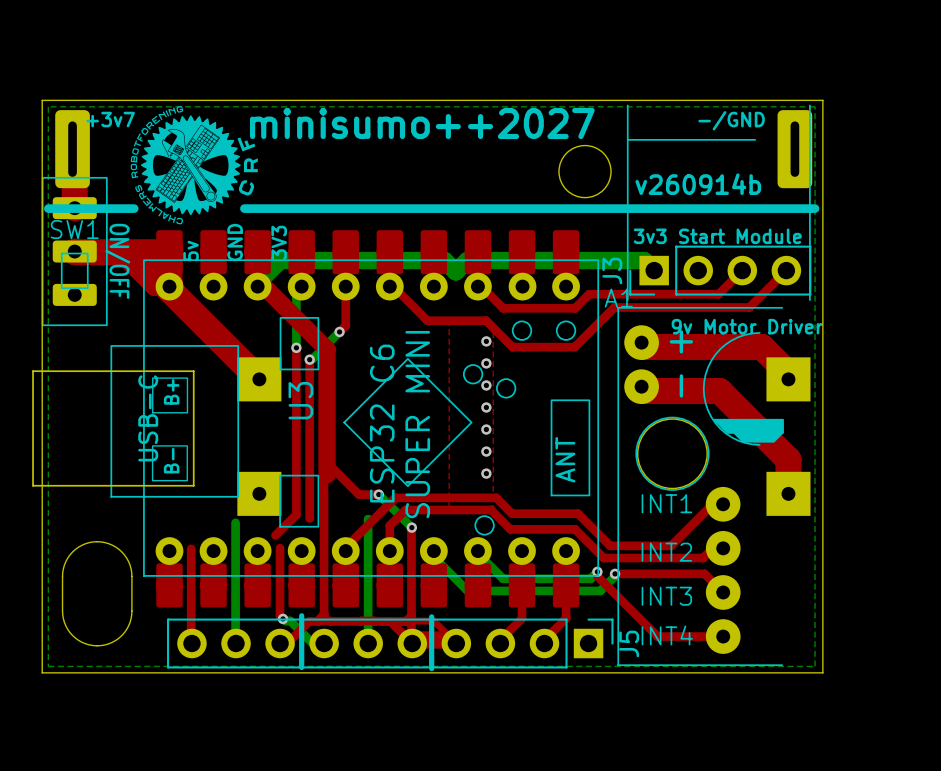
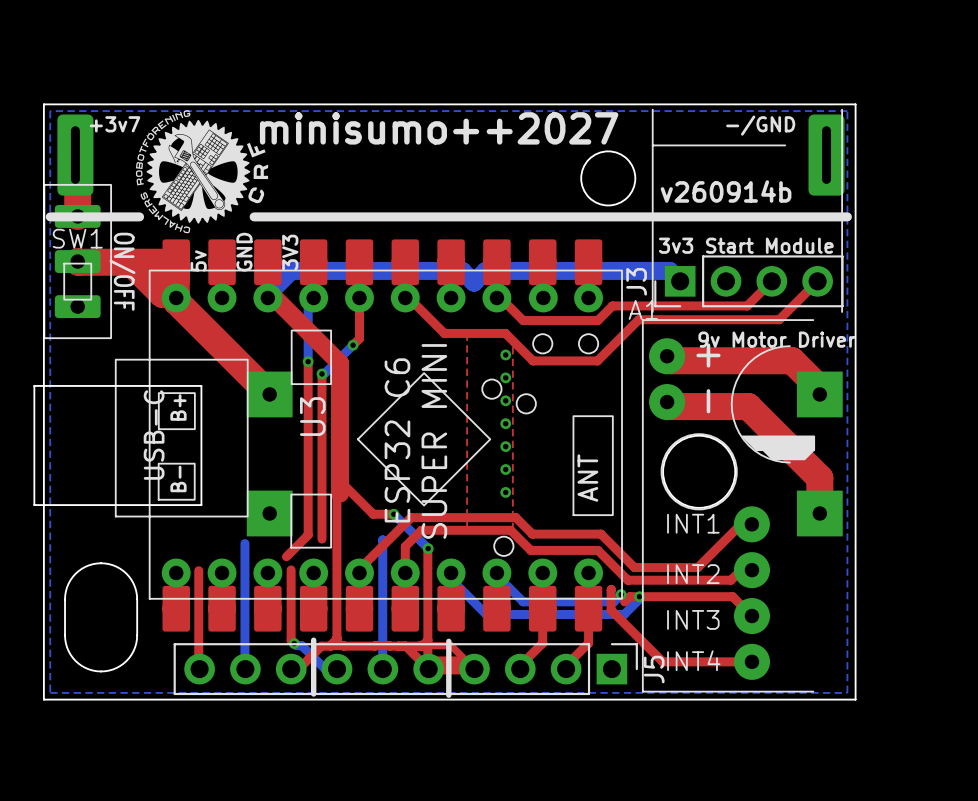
top track: (597, 571) (597, 576) (657, 636) -> (611, 589) (611, 610) (662, 661) (683, 661)
top track: none -> (639, 596) (629, 596) (624, 601)

